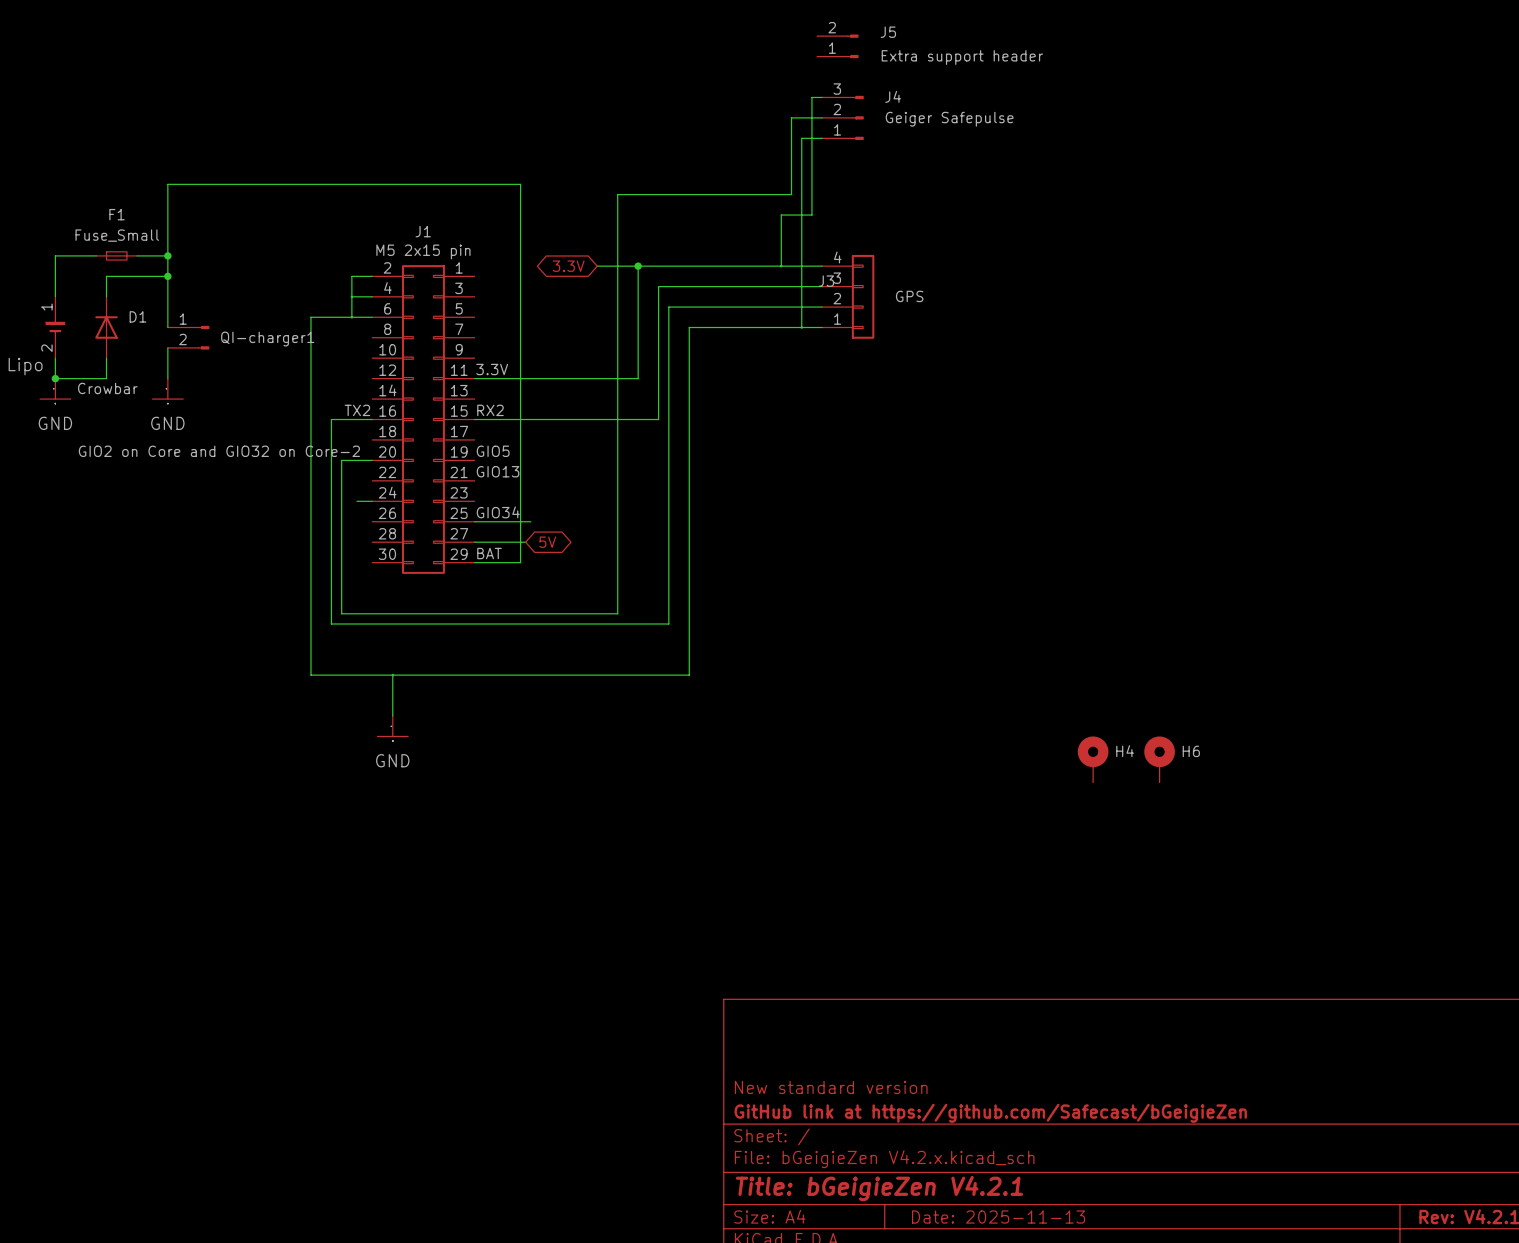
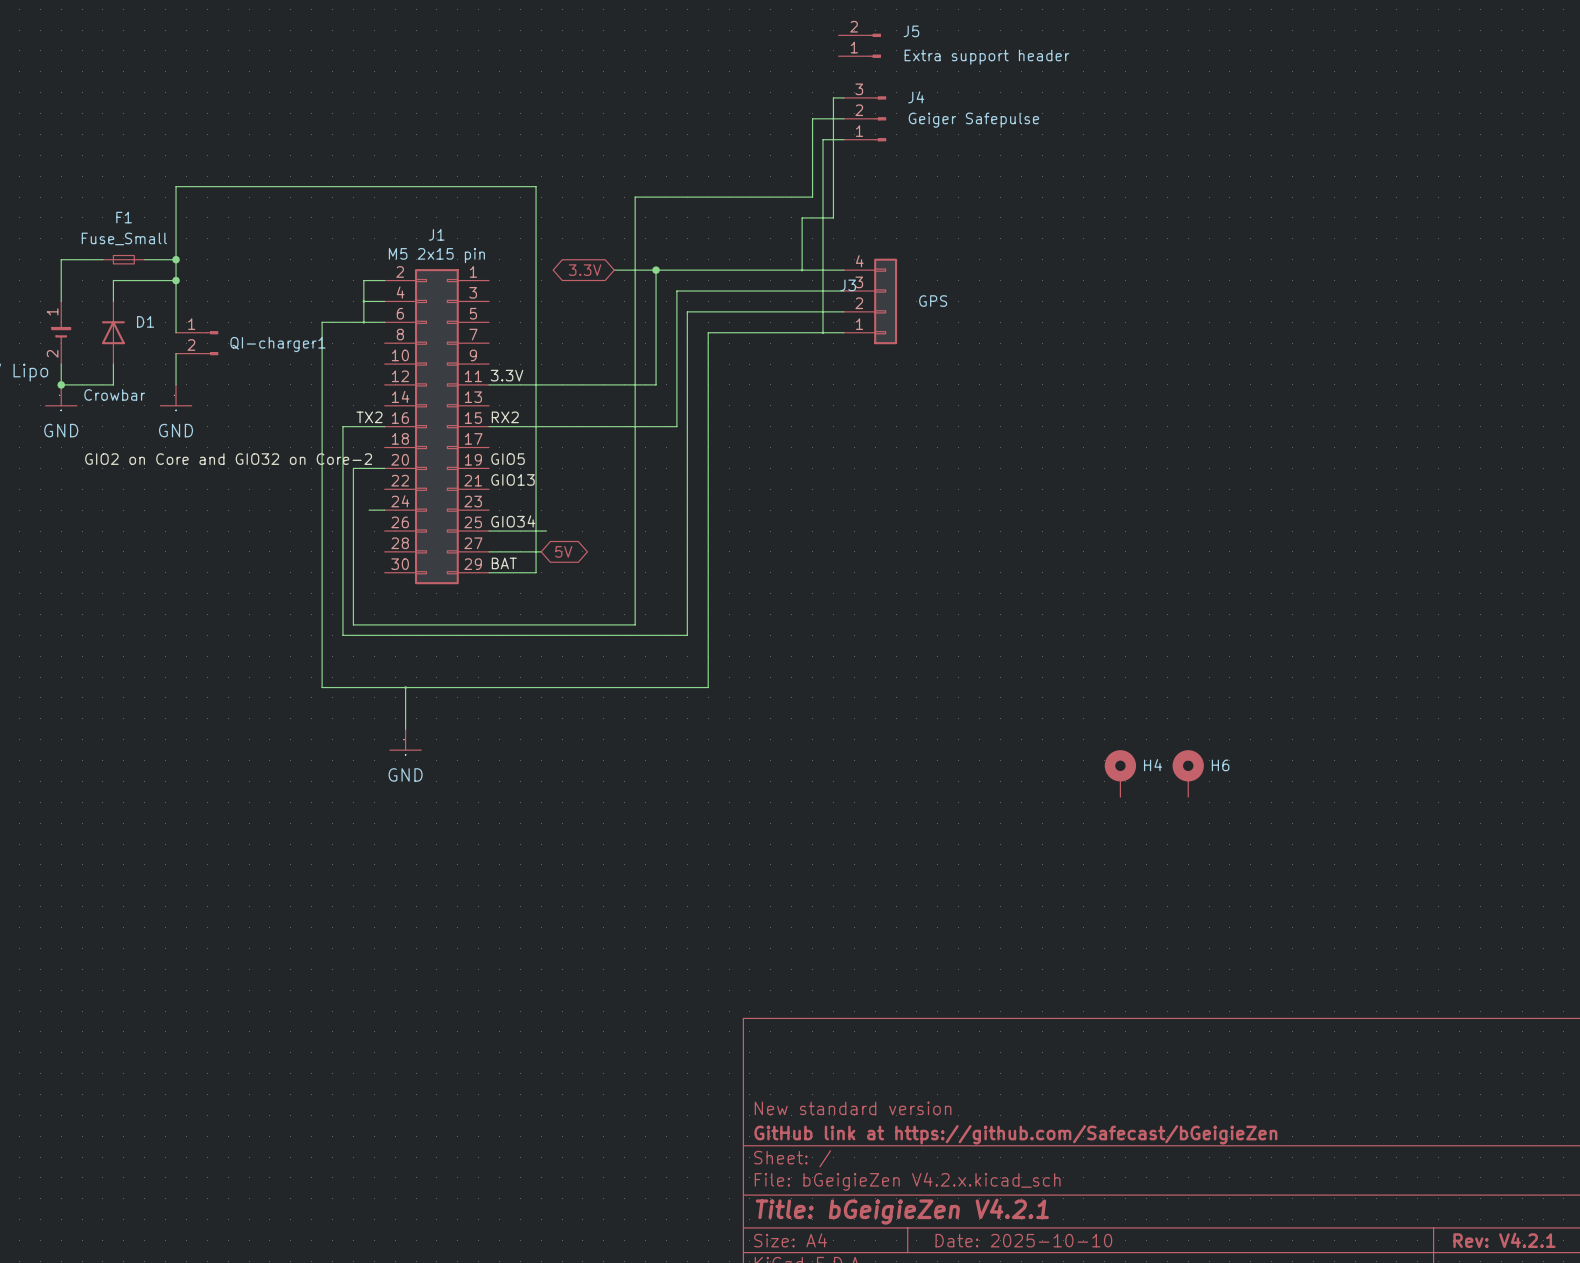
title block: Date: 2025-11-13 (998, 1217) -> Date: 2025-10-10 (1023, 1240)

